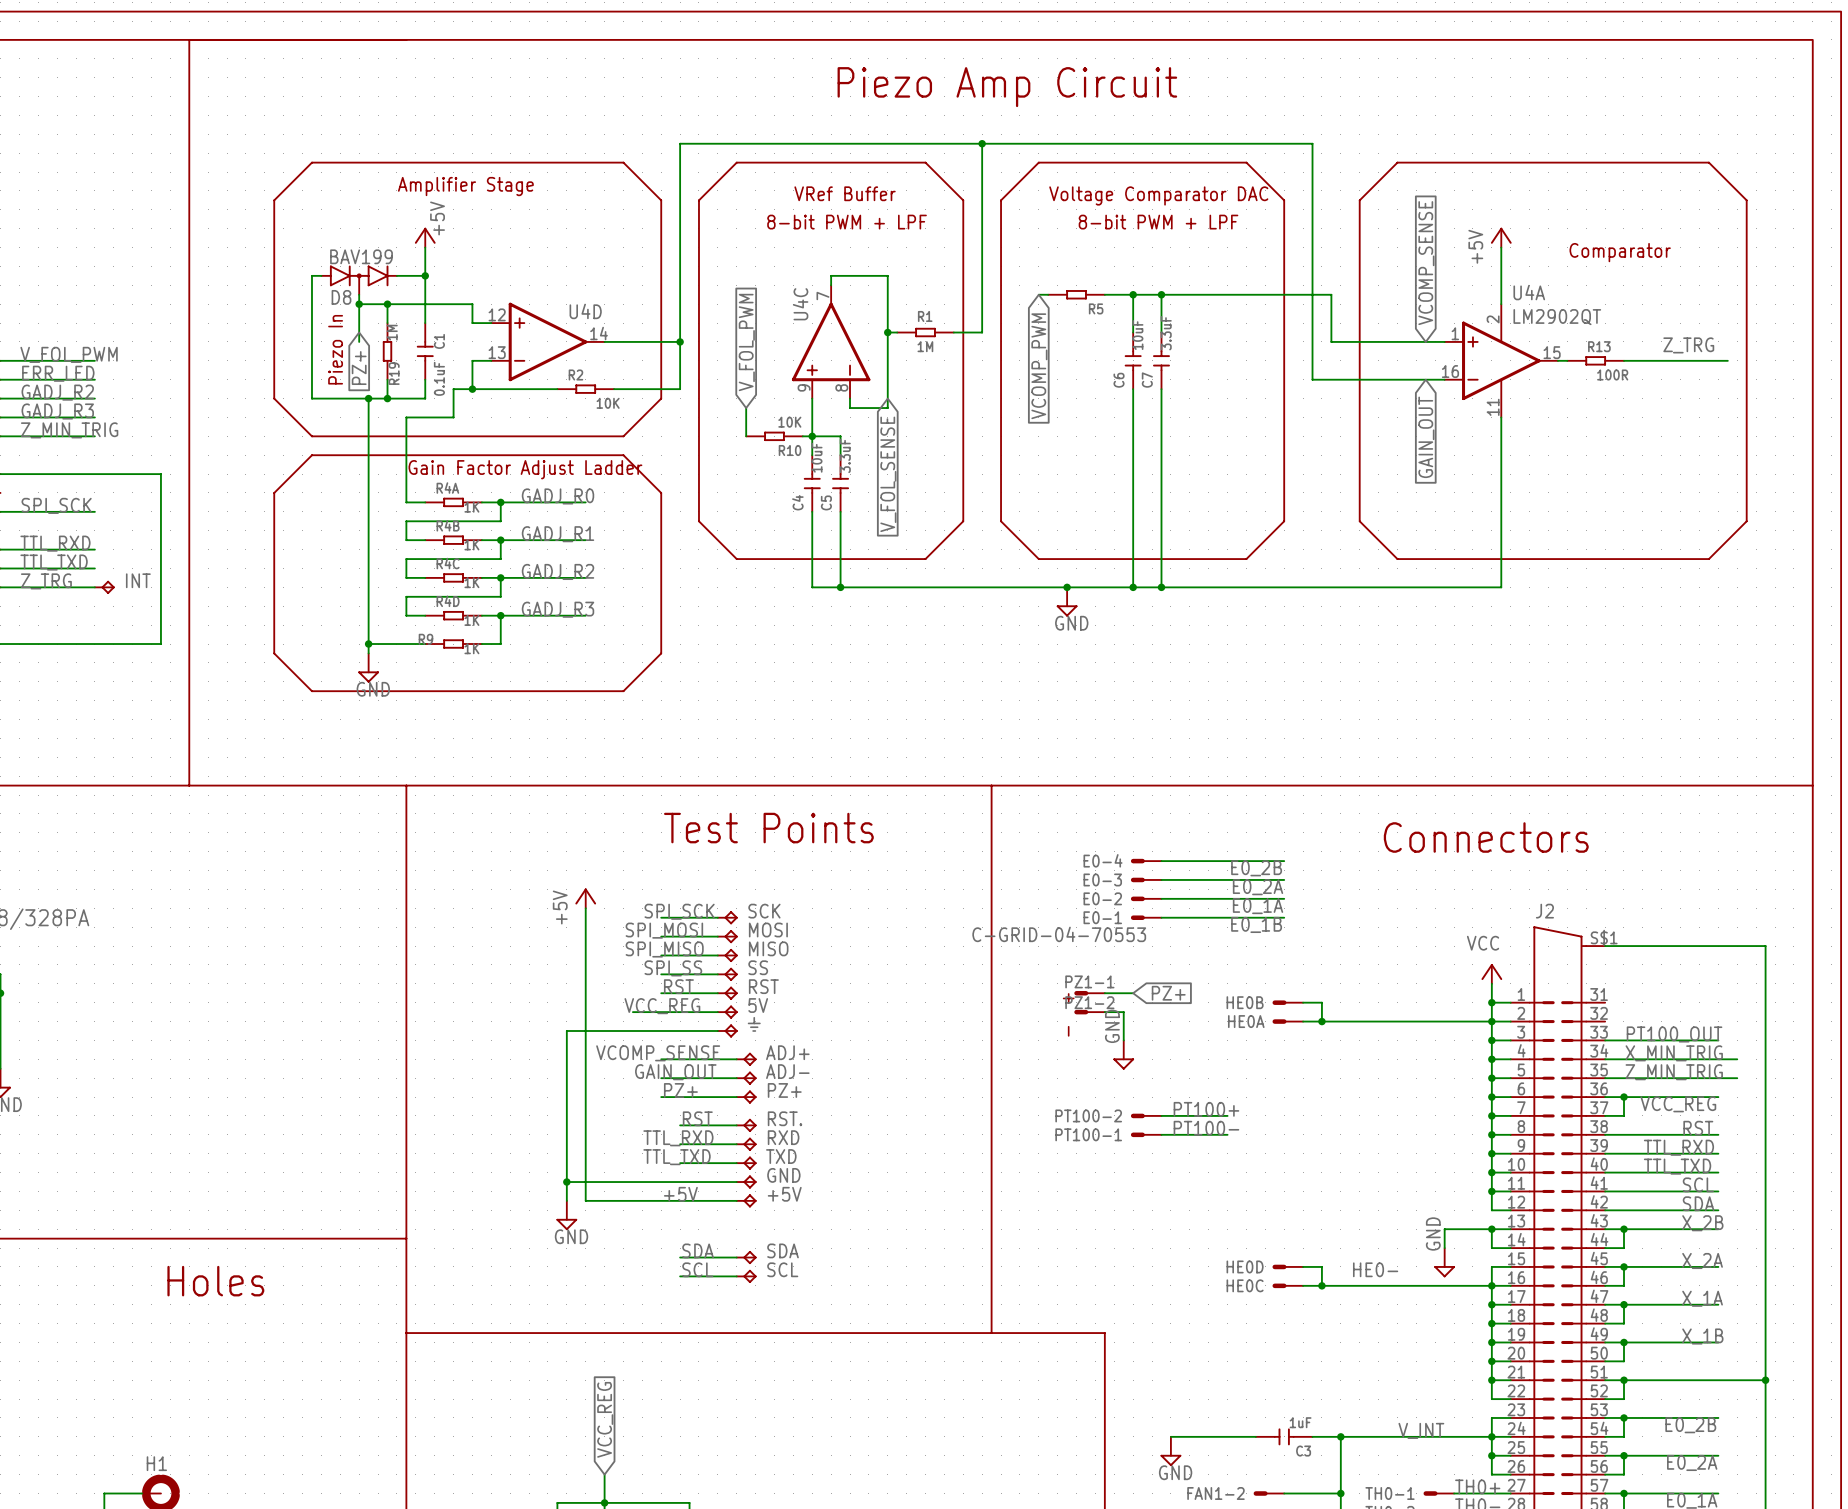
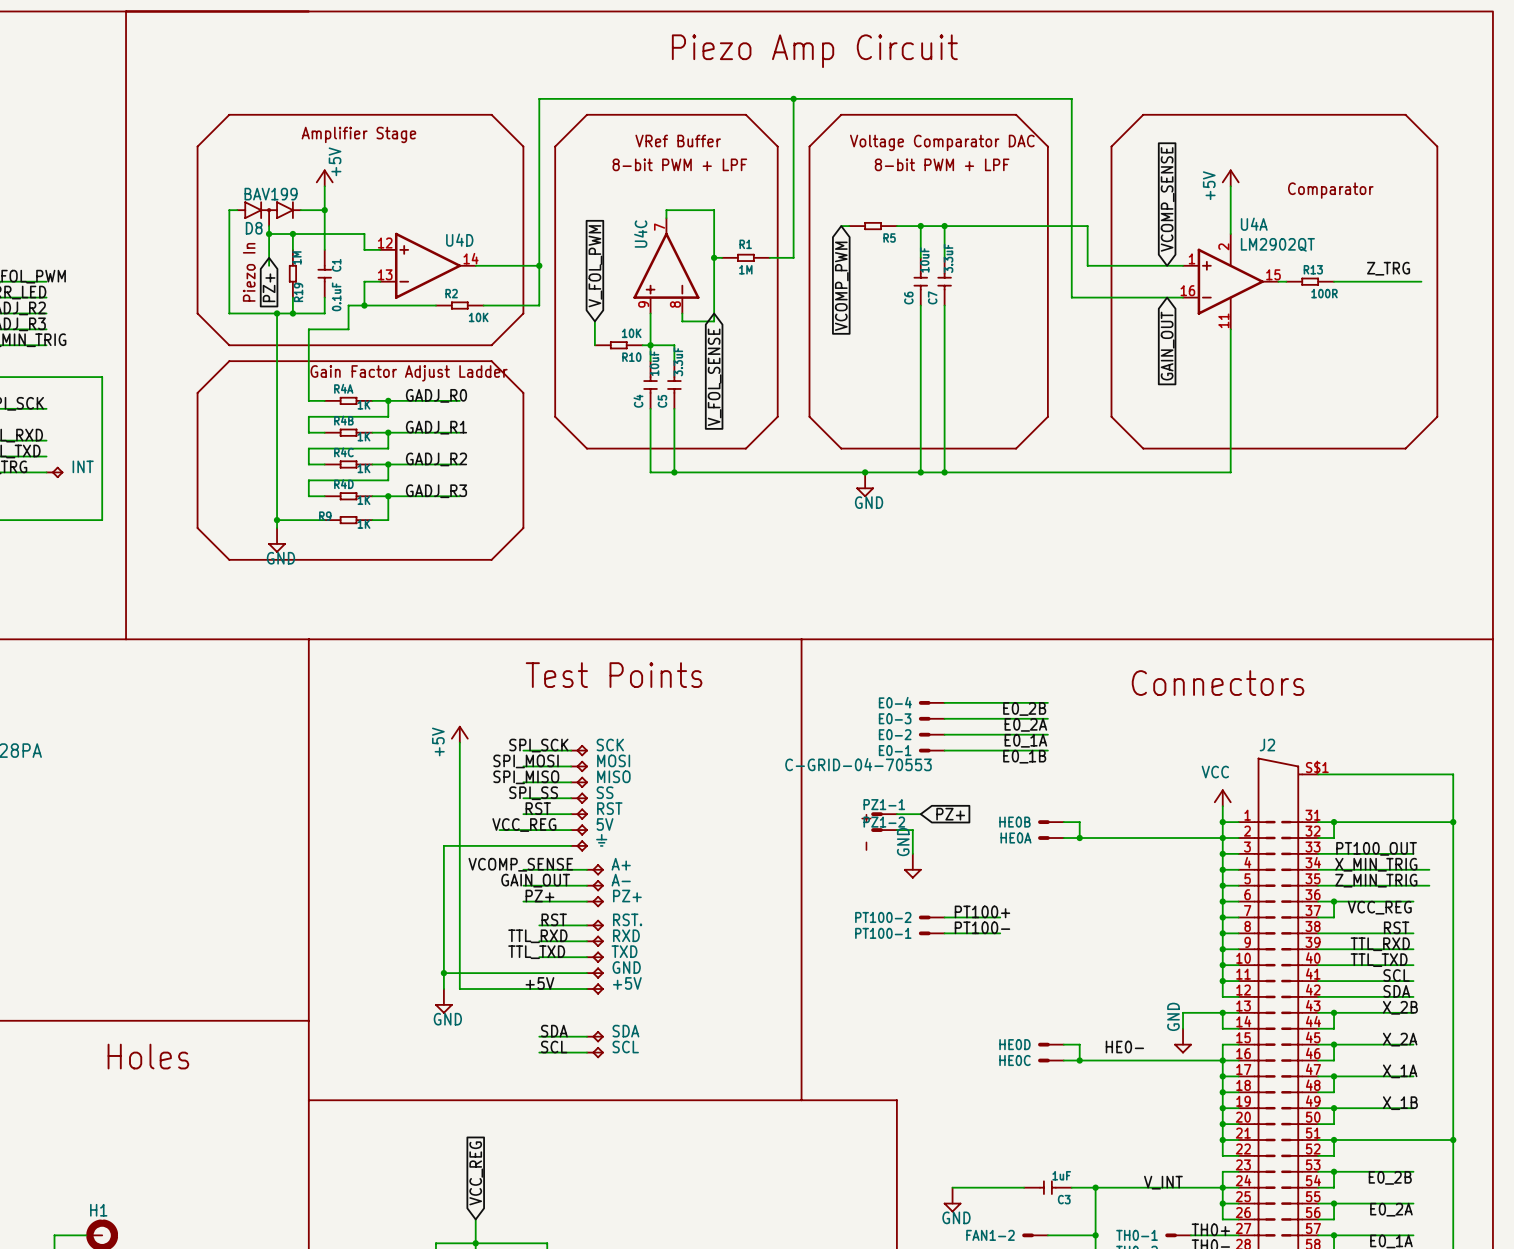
wire: none -> (1318, 822) (1453, 822)
wire: none -> (1334, 822) (1334, 838) (1318, 838)
junction: none -> (1334, 822)
junction: none -> (1453, 822)
ADJ+ name: ADJ+ (787, 1052) -> A+ (621, 864)
ADJ- name: ADJ- (787, 1071) -> A- (621, 880)

